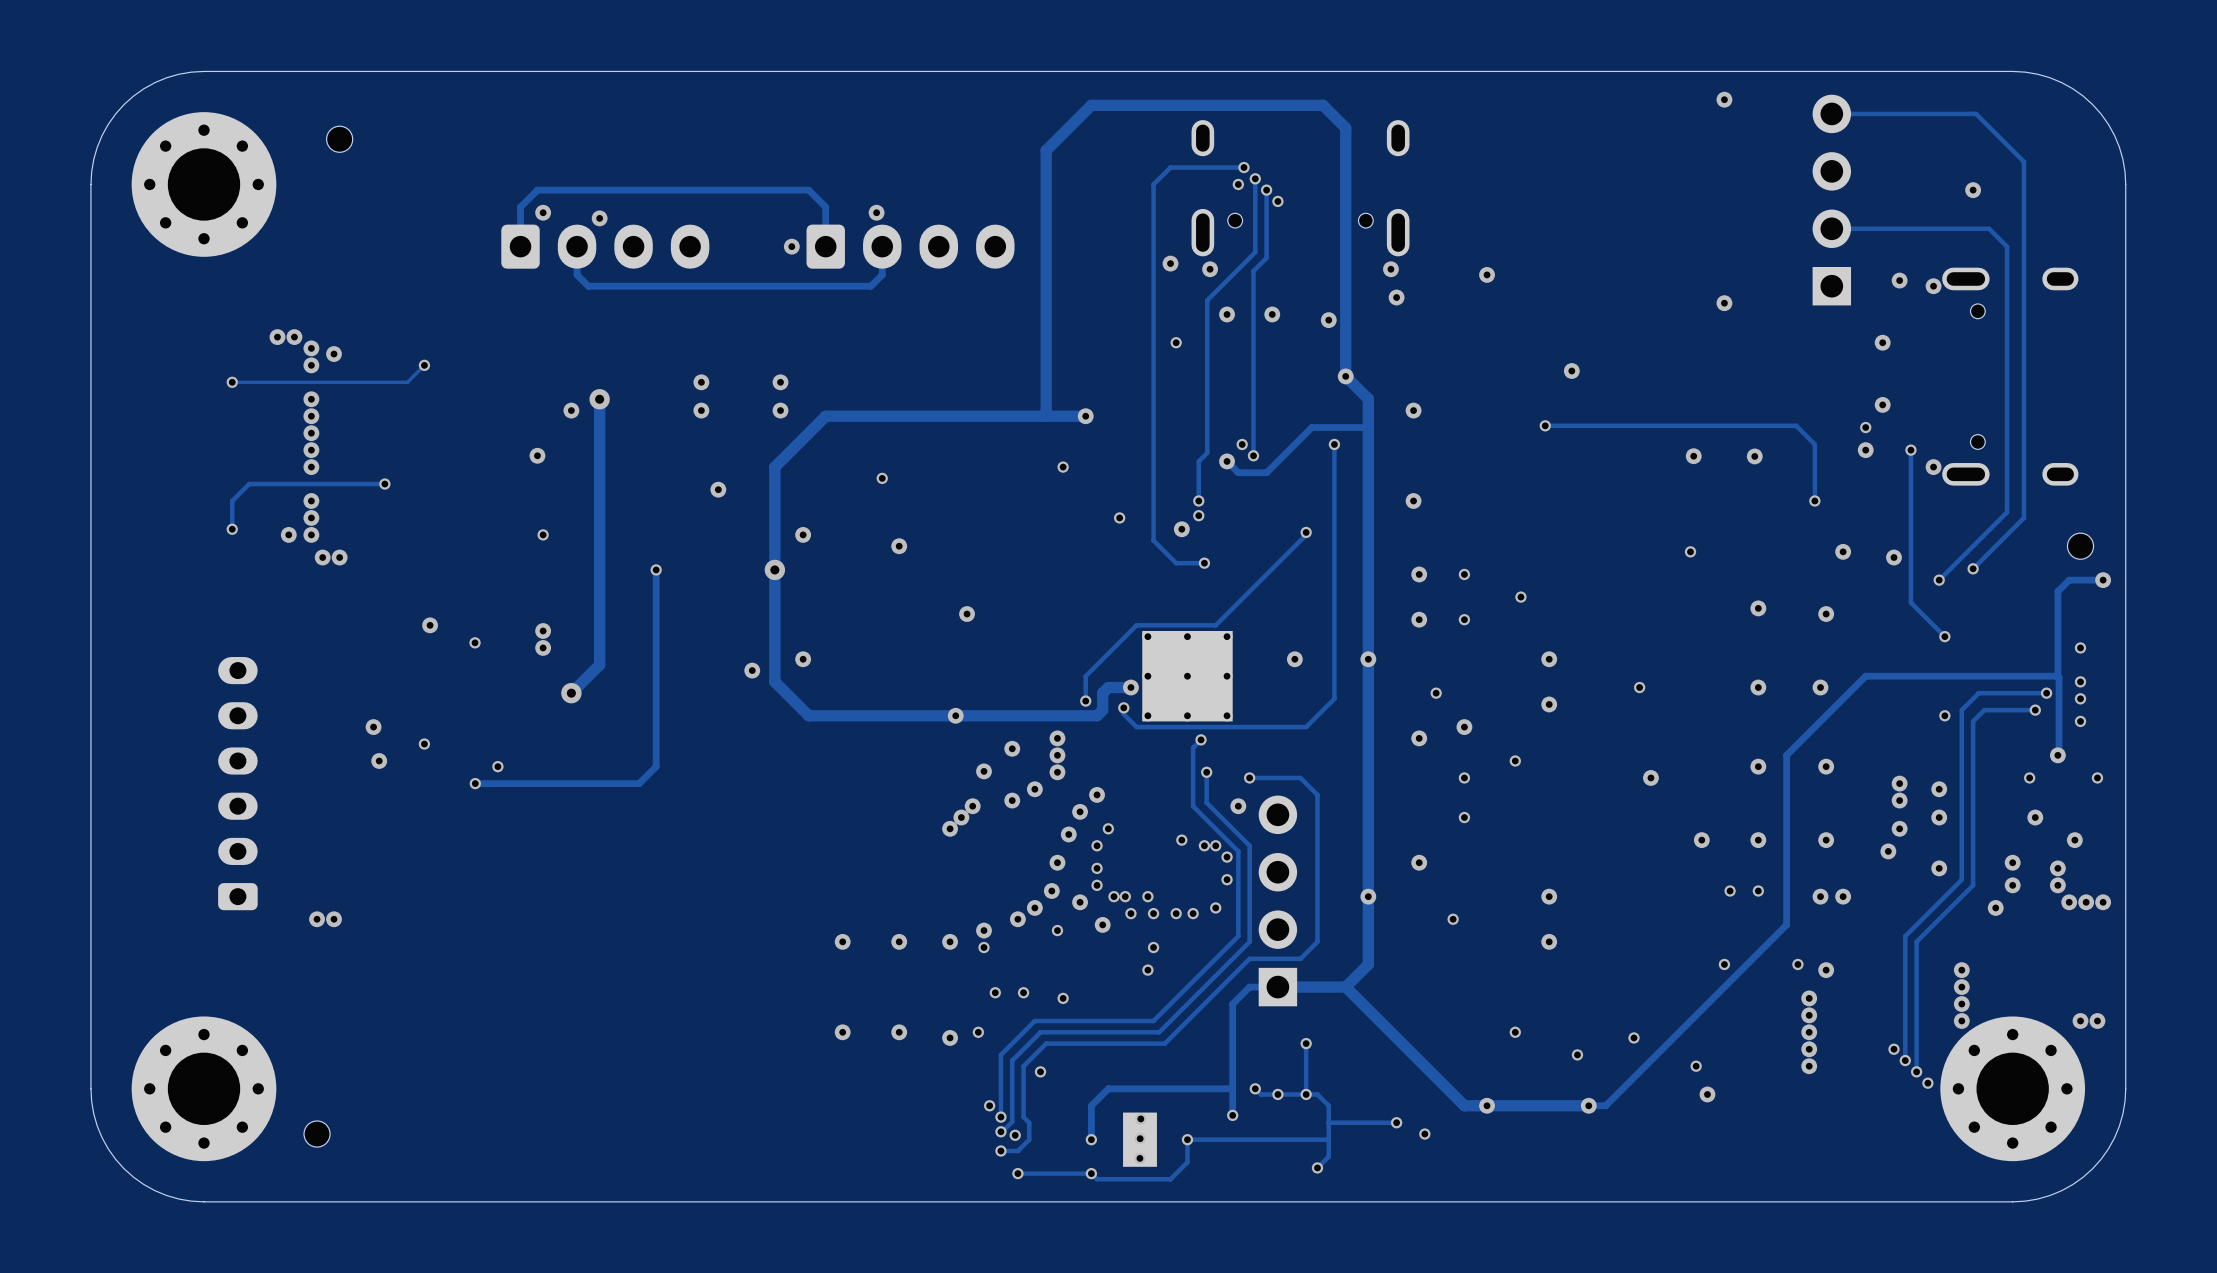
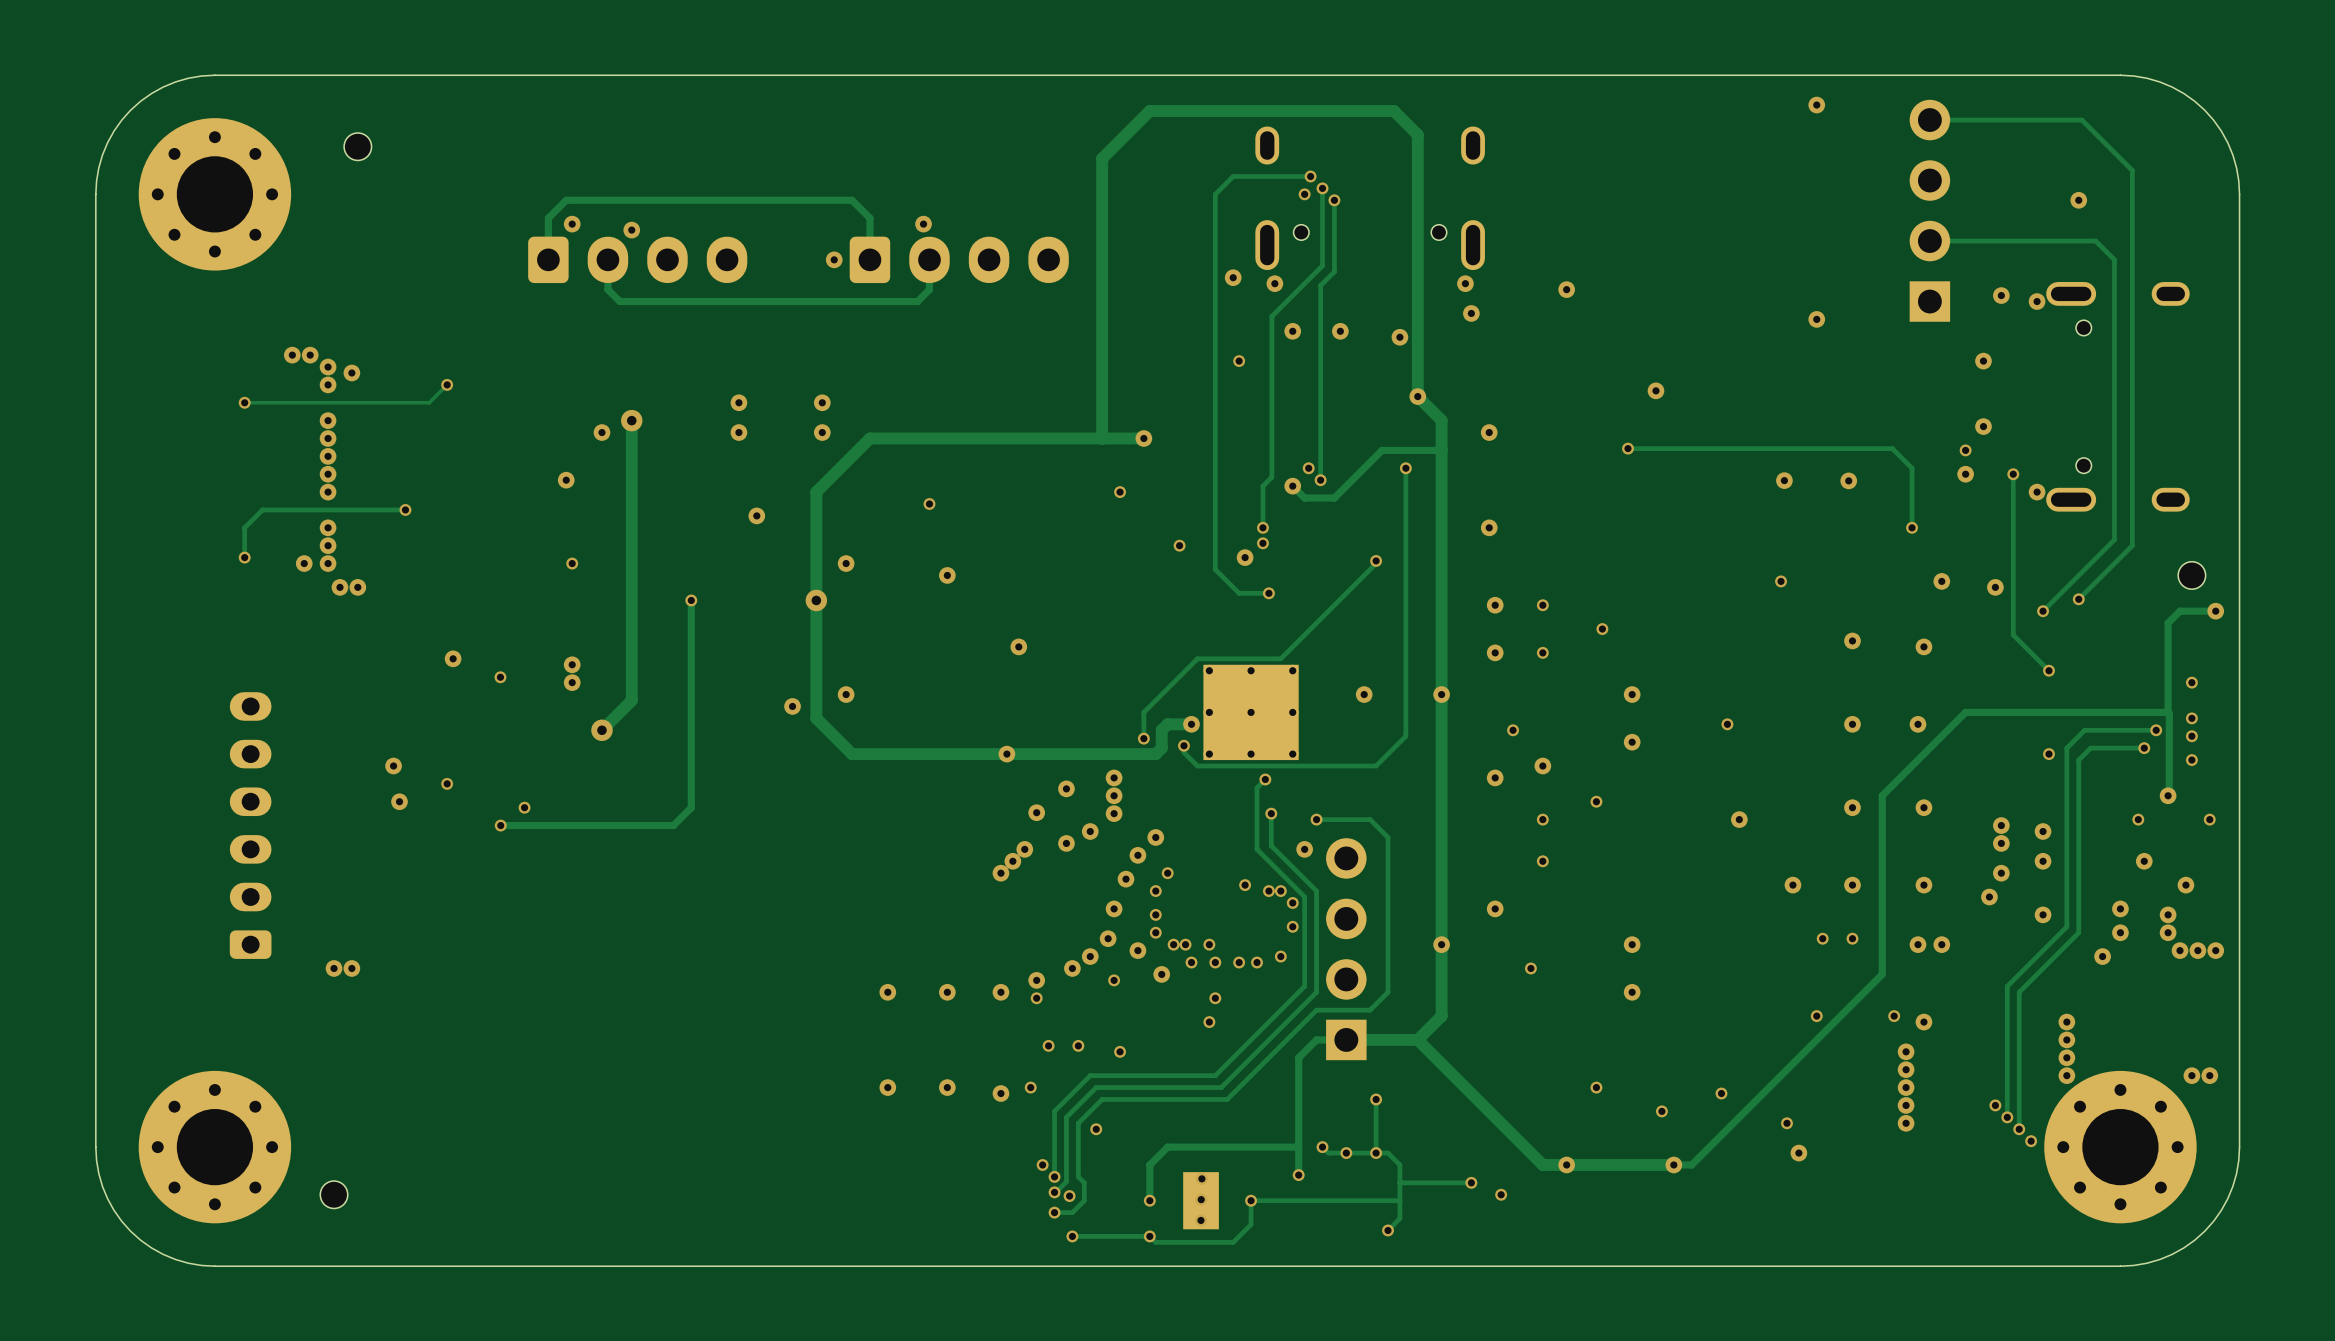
via: (1277, 201) -> none

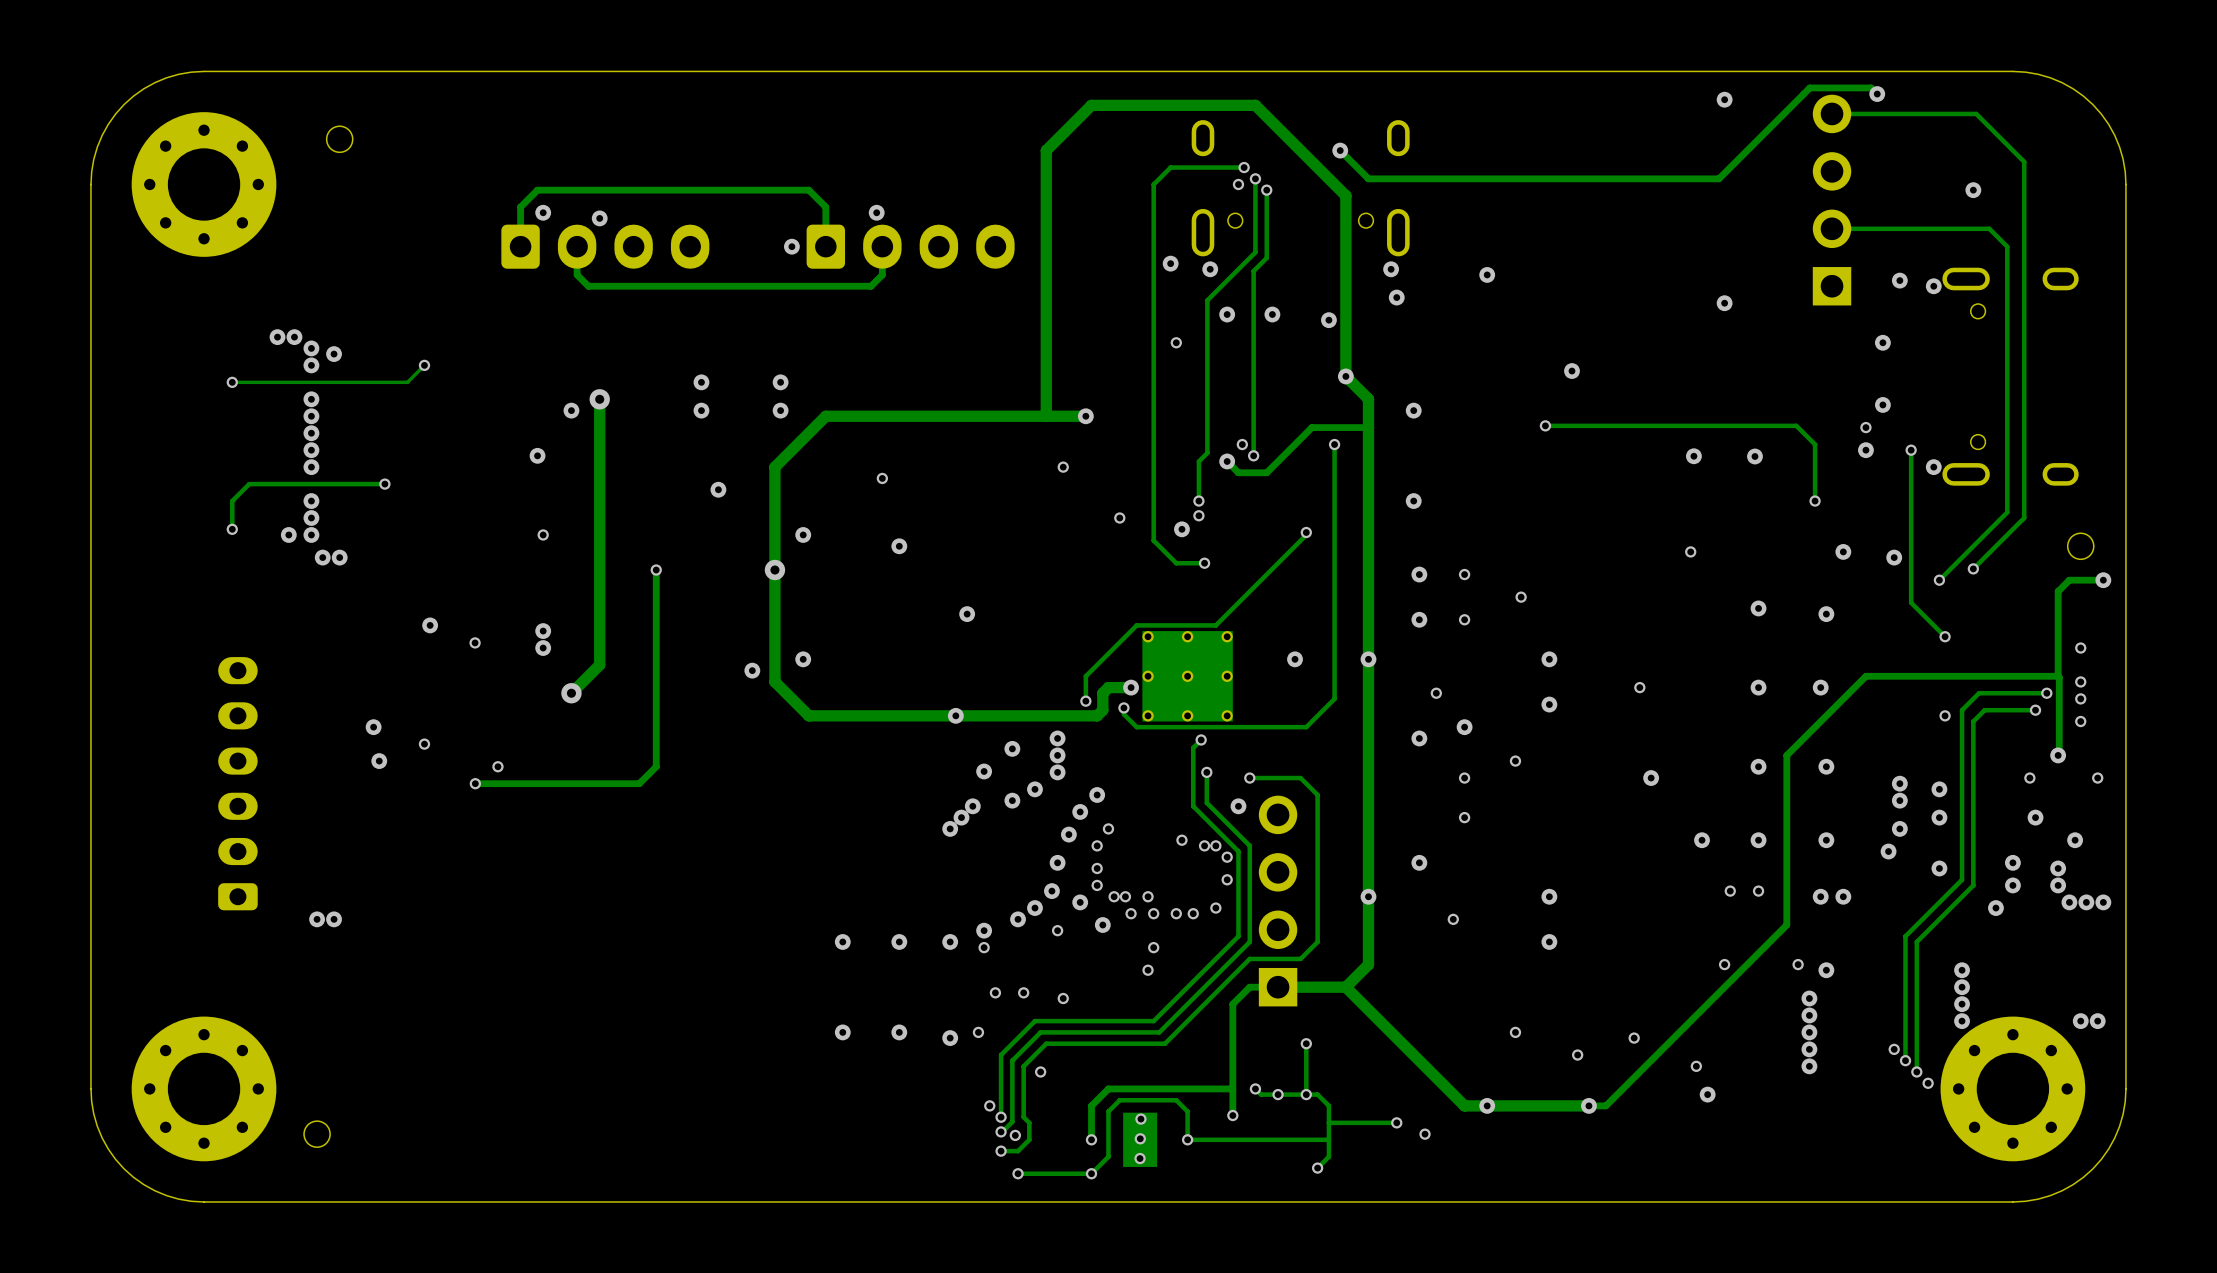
track: none -> (1877, 94) (1871, 87) (1809, 87) (1718, 178) (1368, 178) (1340, 150)
via: none -> (1877, 94)
track: (1322, 110) (1393, 110) (1417, 134) (1417, 206) -> (1255, 105) (1345, 195)
via: none -> (1340, 150)
track: (1251, 1200) (1251, 1224) (1233, 1242) (1155, 1242) (1149, 1236) -> (1187, 1139) (1187, 1111) (1176, 1100) (1119, 1100) (1108, 1111) (1108, 1156) (1091, 1173)

